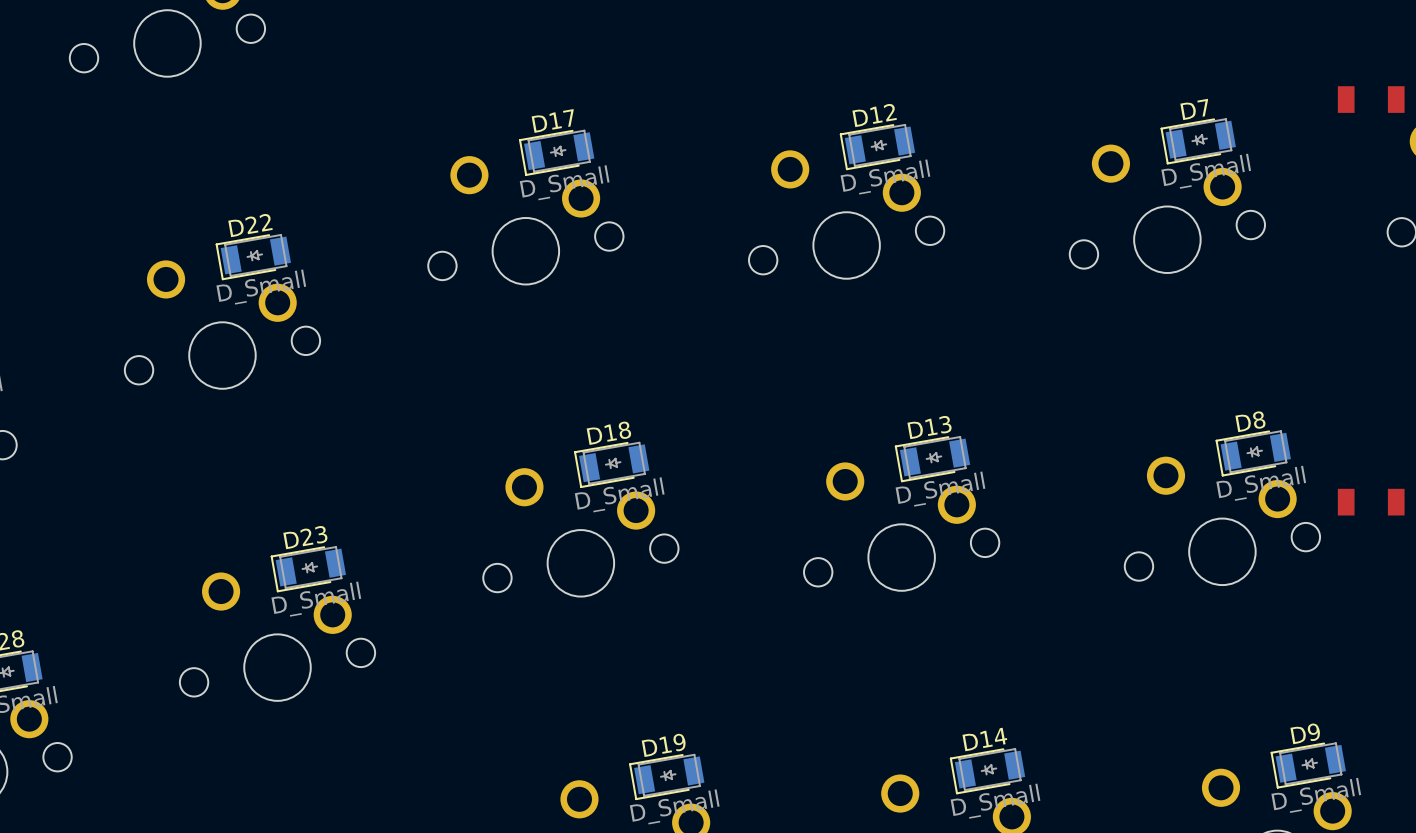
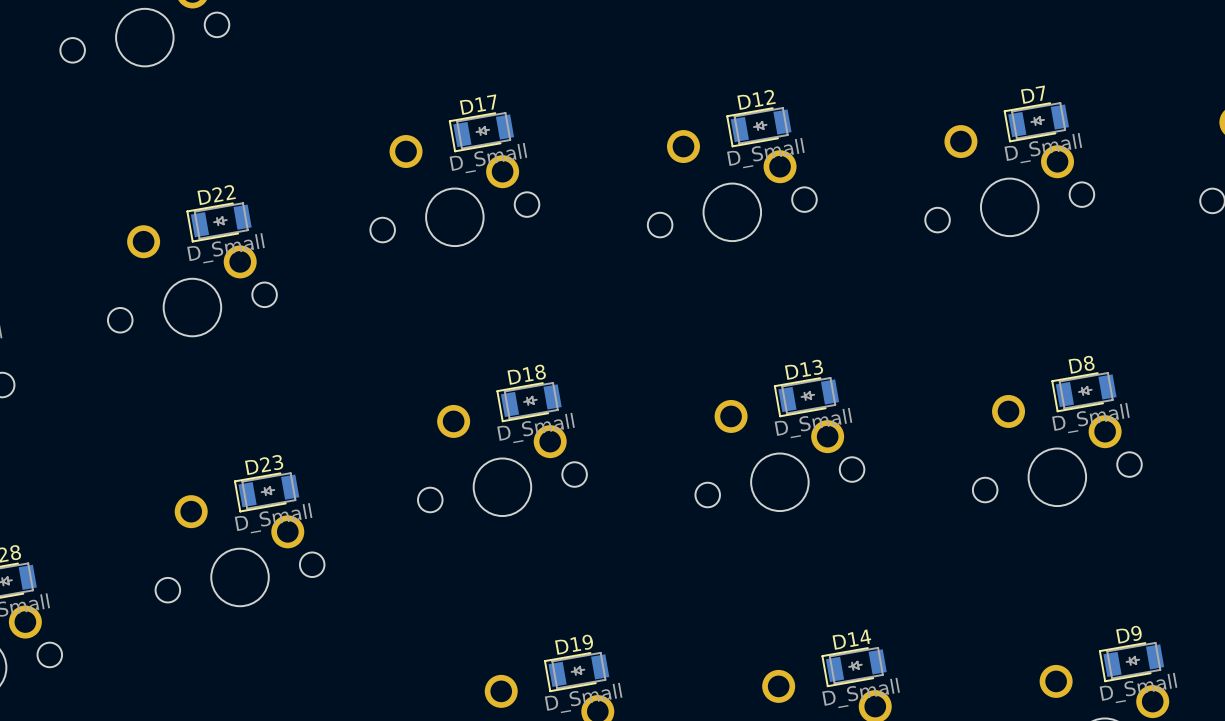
part: (1371, 99) -> none
part: (1371, 502) -> none

